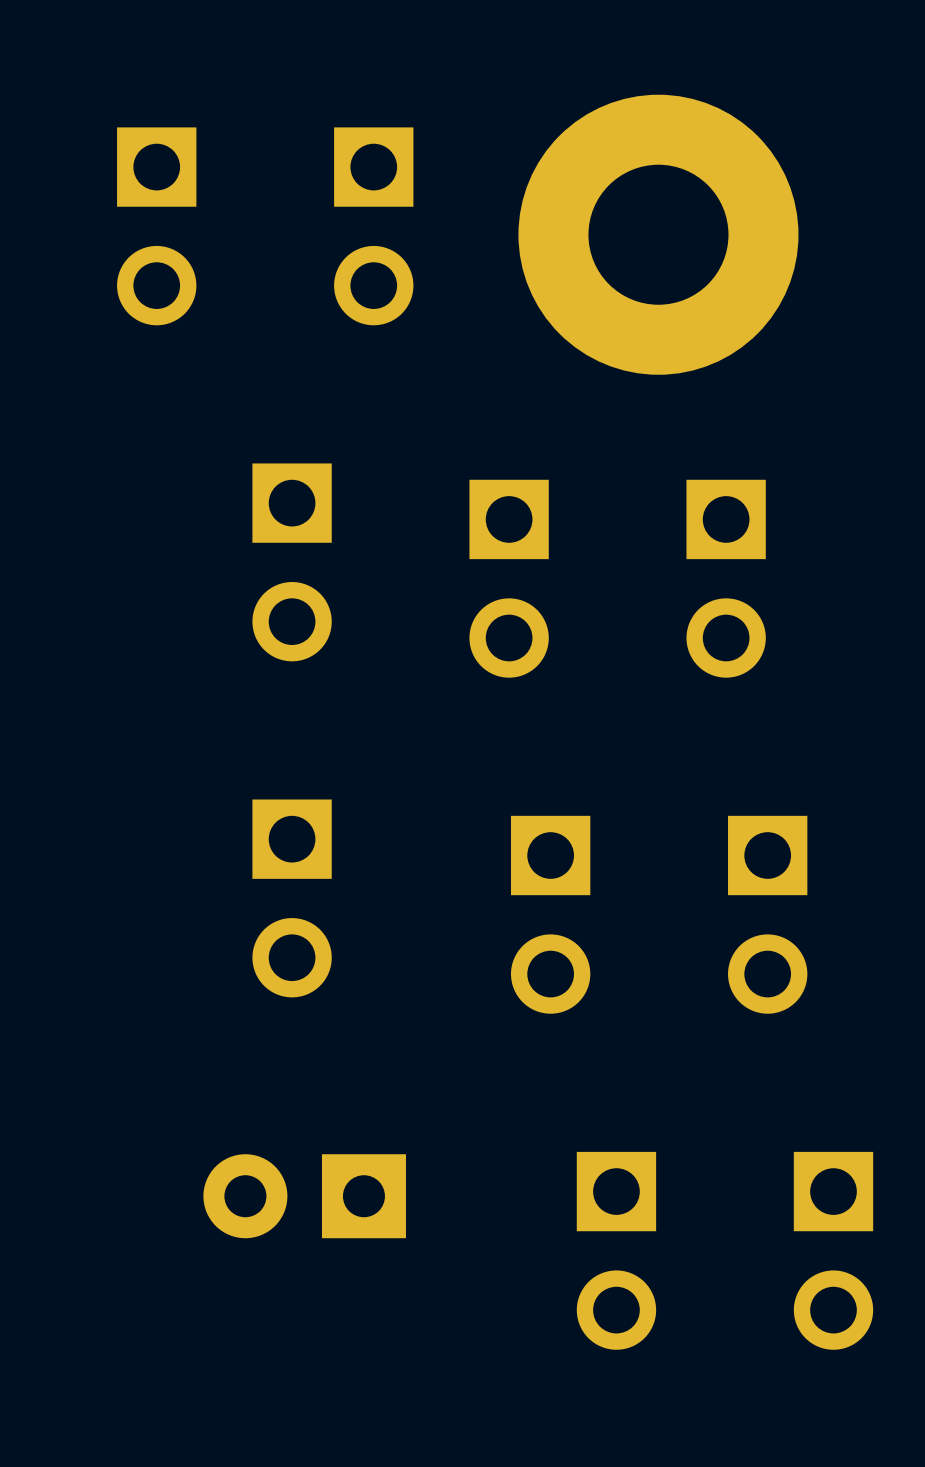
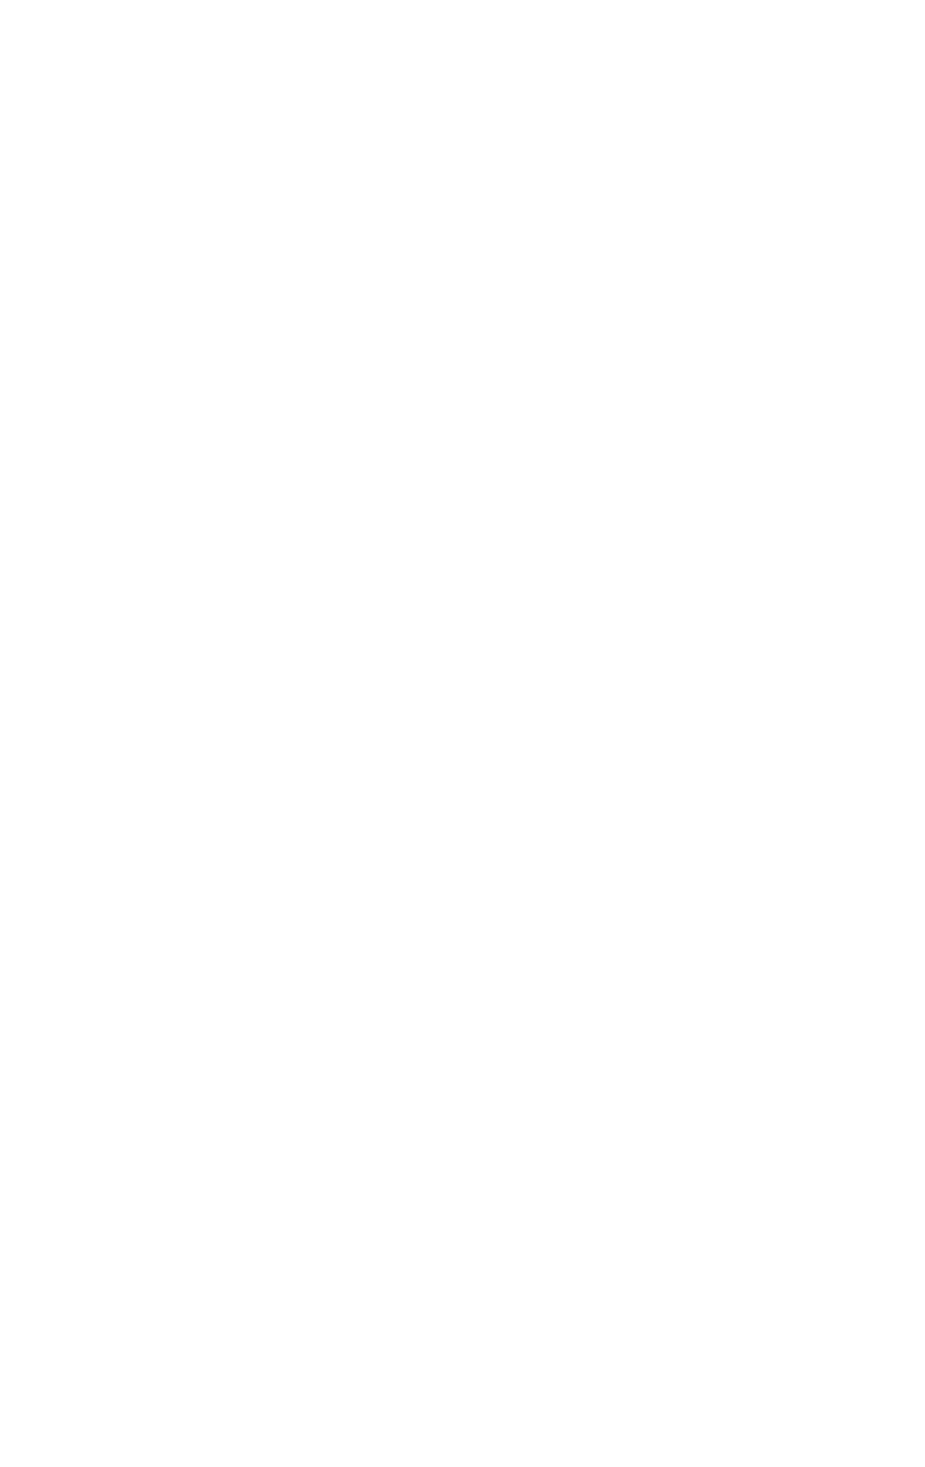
part: (156, 226) -> none
part: (373, 226) -> none
part: (658, 234) -> none
part: (292, 562) -> none
part: (509, 578) -> none
part: (726, 578) -> none
part: (292, 898) -> none
part: (550, 914) -> none
part: (767, 914) -> none
part: (304, 1196) -> none
part: (616, 1250) -> none
part: (833, 1250) -> none

